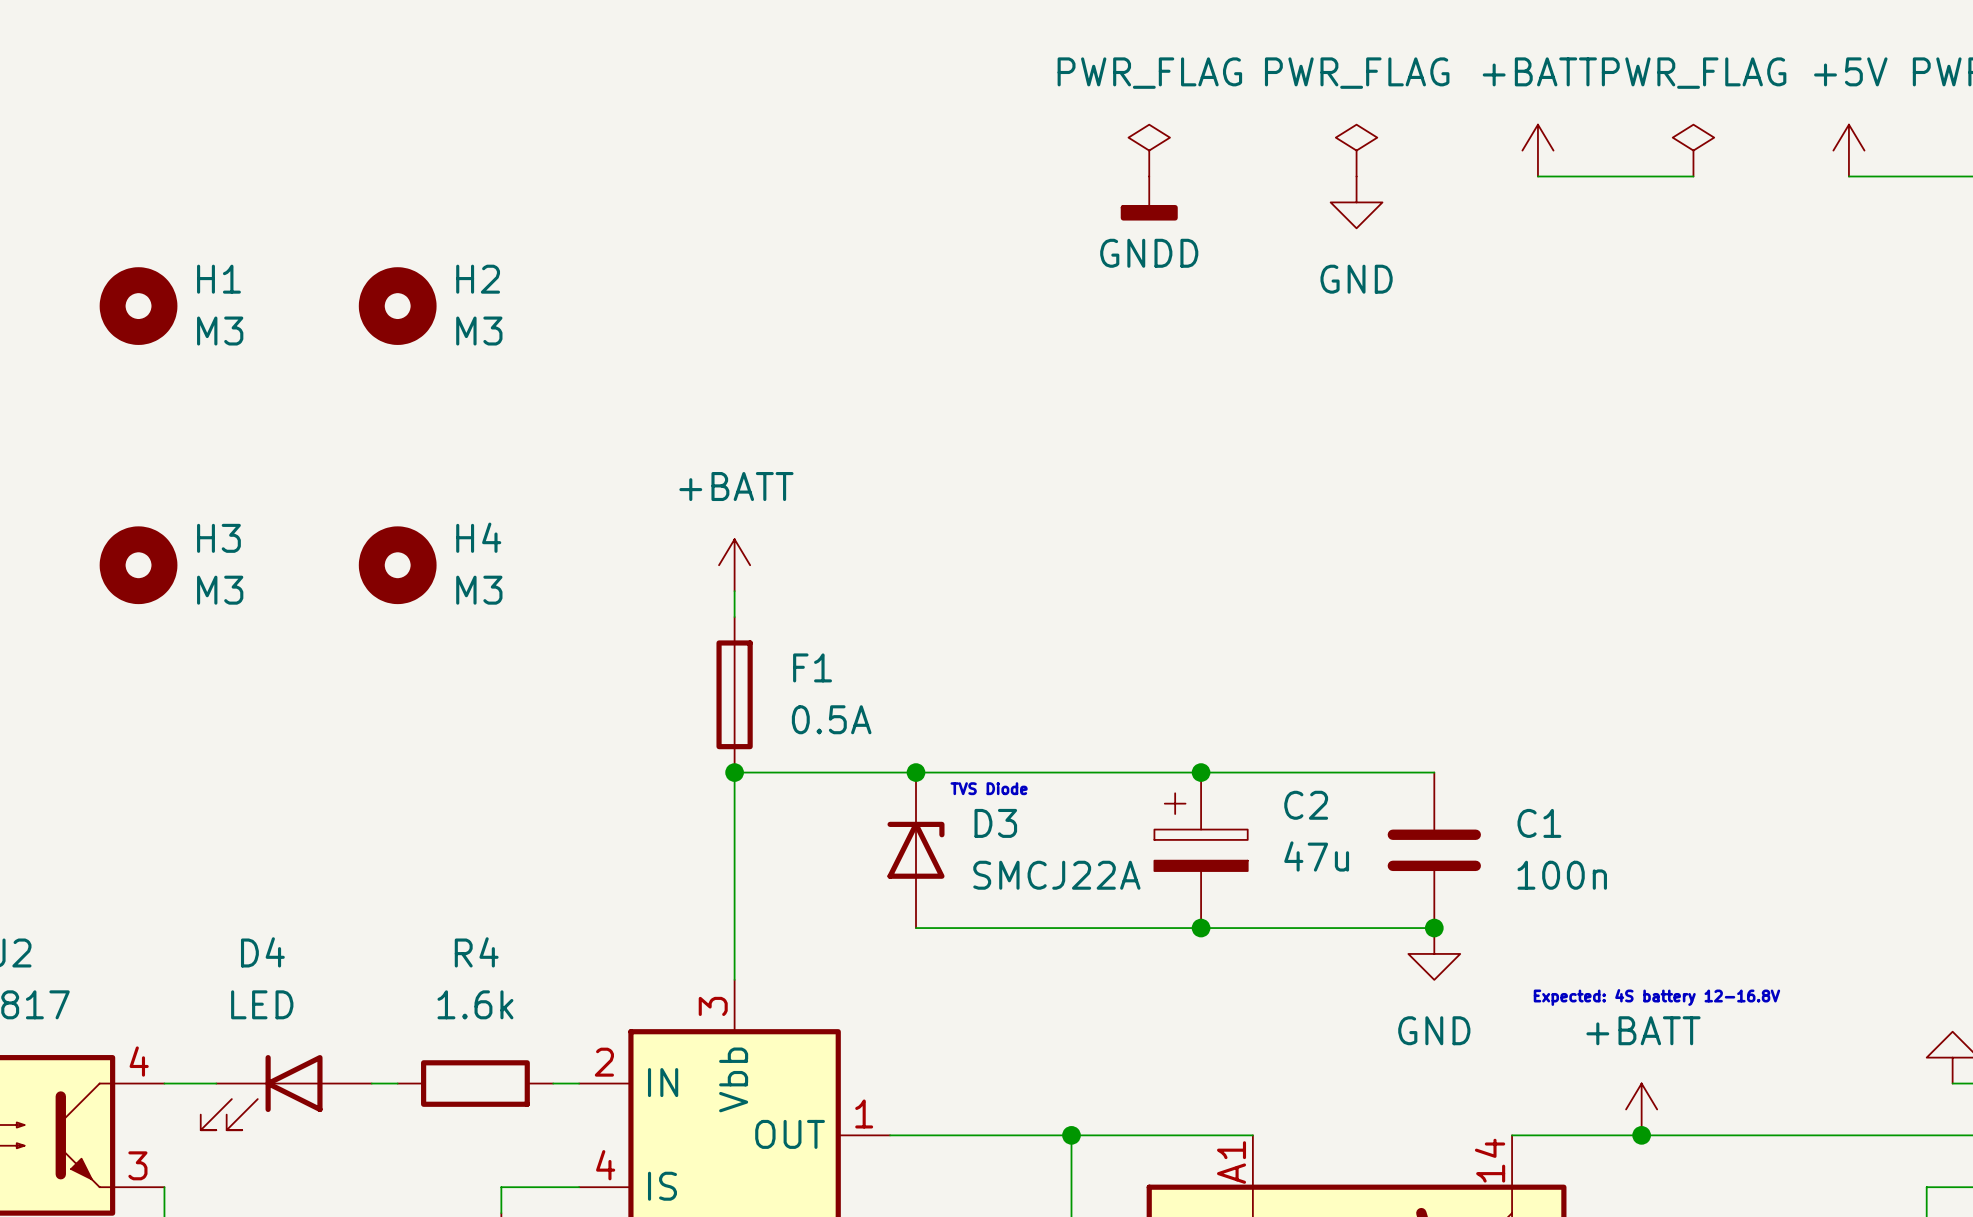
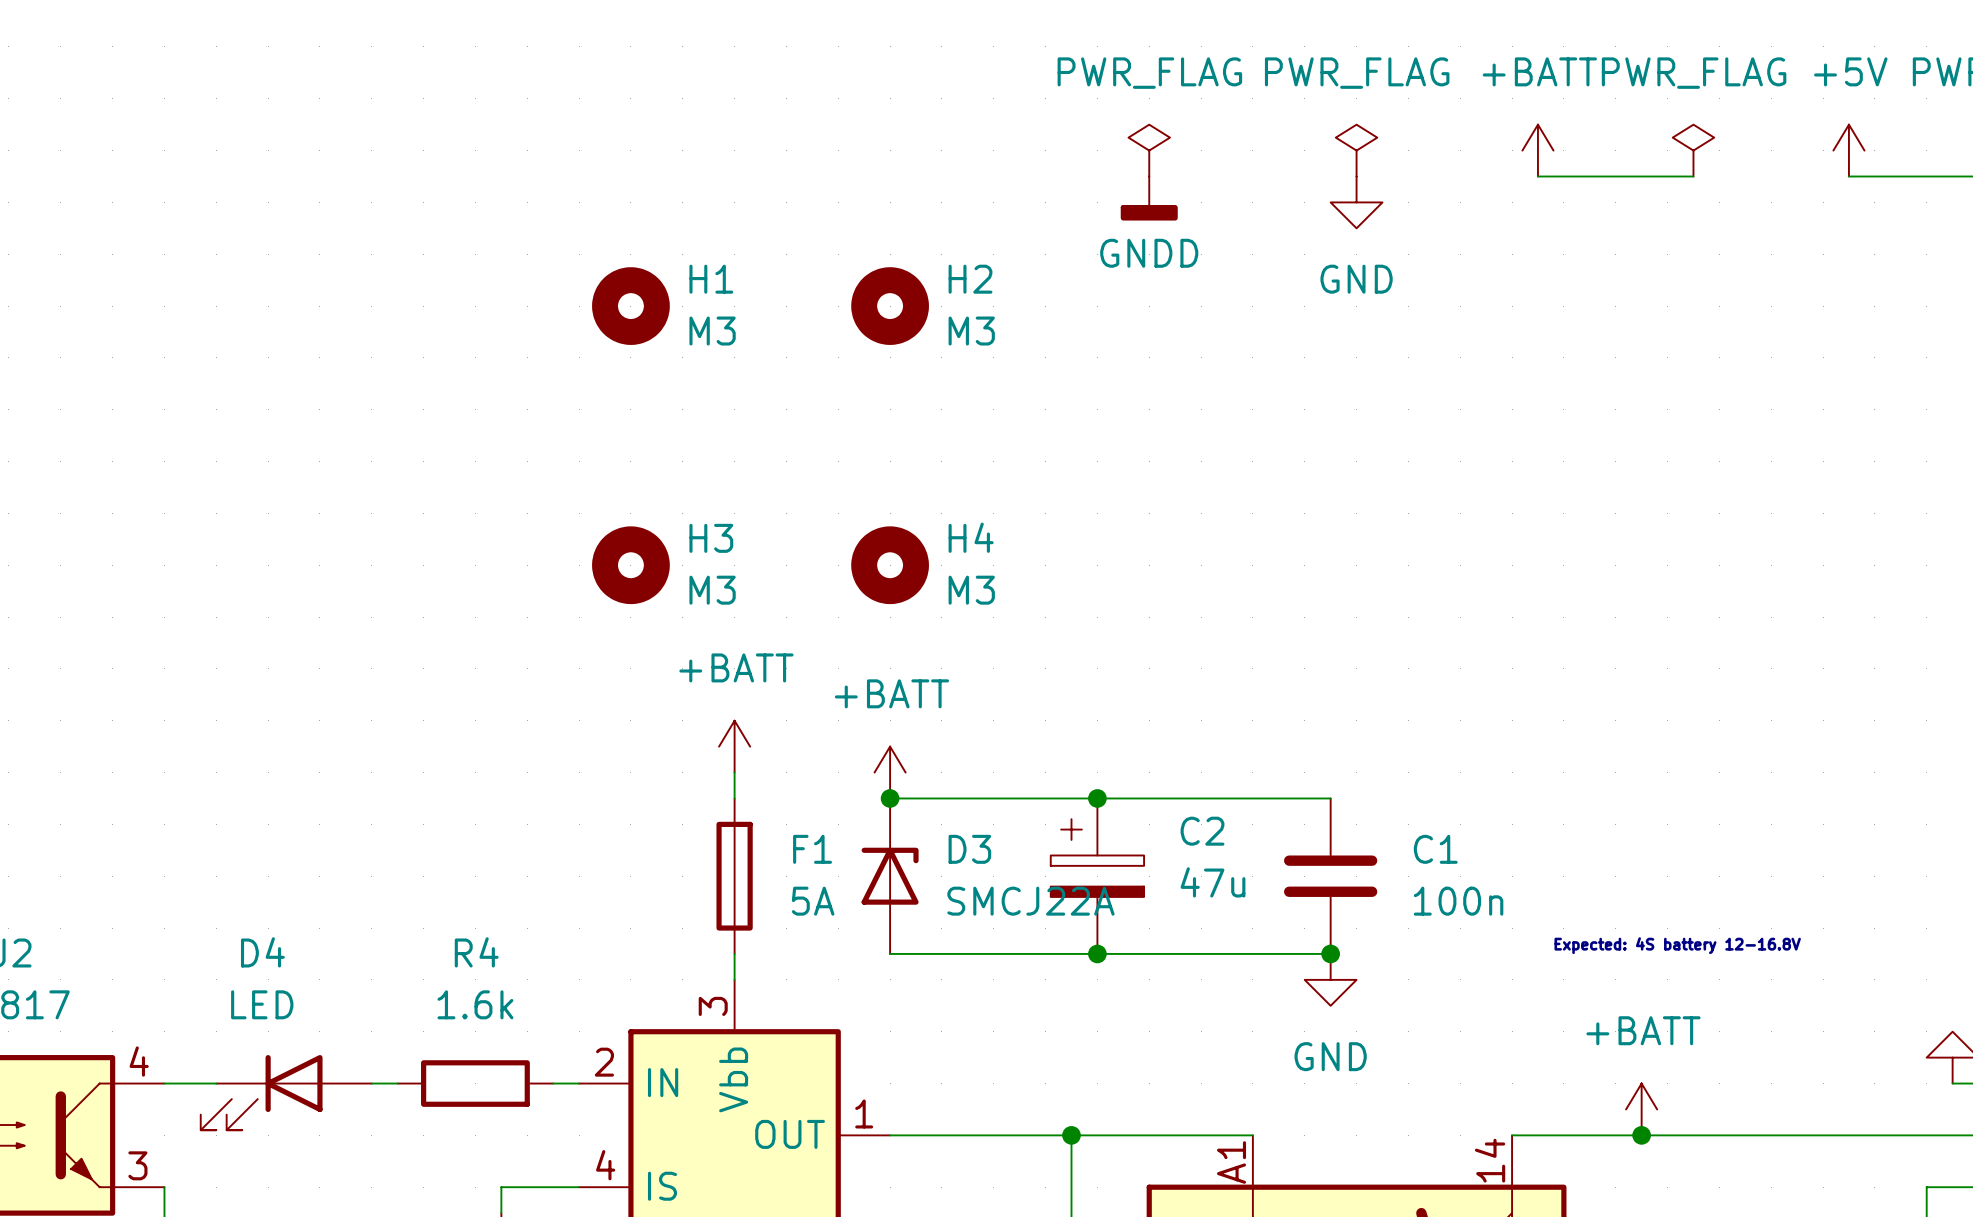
H1 position: (138, 306) -> (630, 306)
H2 position: (397, 306) -> (890, 306)
H3 position: (138, 565) -> (630, 565)
H4 position: (397, 565) -> (890, 565)
power symbol: +BATT (734, 565) -> none
wire: (734, 591) (734, 617) -> none
F1 position: (734, 694) -> (734, 876)
F1 value: 0.5A (831, 719) -> 5A (813, 901)
power symbol: none -> +BATT (734, 746)
wire: (734, 772) (1434, 772) -> none
junction: (734, 772) -> none
power symbol: none -> +BATT (890, 772)
junction position: (916, 772) -> (890, 798)
junction: (1201, 772) -> none
text: TVS Diode (989, 788) -> none
wire: none -> (890, 798) (1330, 798)
junction: none -> (1097, 798)
D3 position: (916, 850) -> (890, 876)
C2 position: (1201, 850) -> (1097, 876)
C1 position: (1434, 850) -> (1330, 876)
wire: (916, 928) (1434, 928) -> none
junction: (1201, 928) -> none
junction: (1434, 928) -> none
wire: none -> (890, 953) (1330, 953)
junction: none -> (1097, 953)
junction: none -> (1330, 953)
power symbol position: GND (1434, 953) -> GND (1330, 979)
text position: Expected: 4S battery 12-16.8V (1656, 997) -> Expected: 4S battery 12-16.8V (1677, 945)

